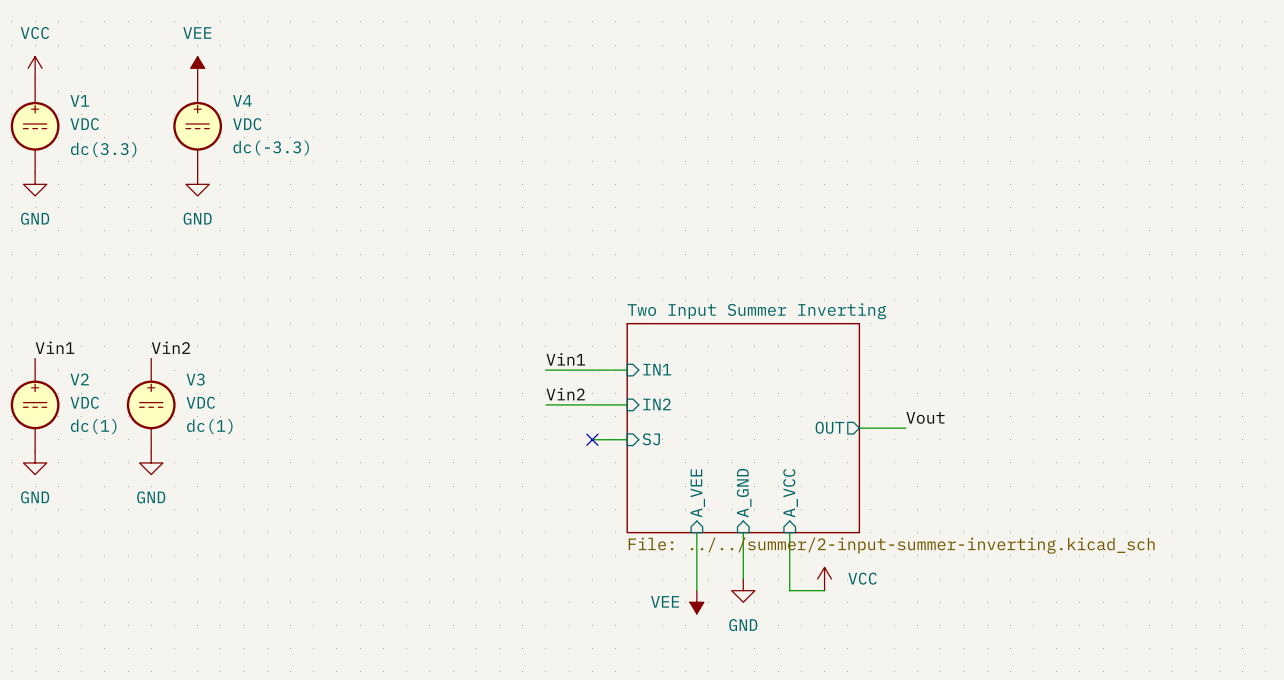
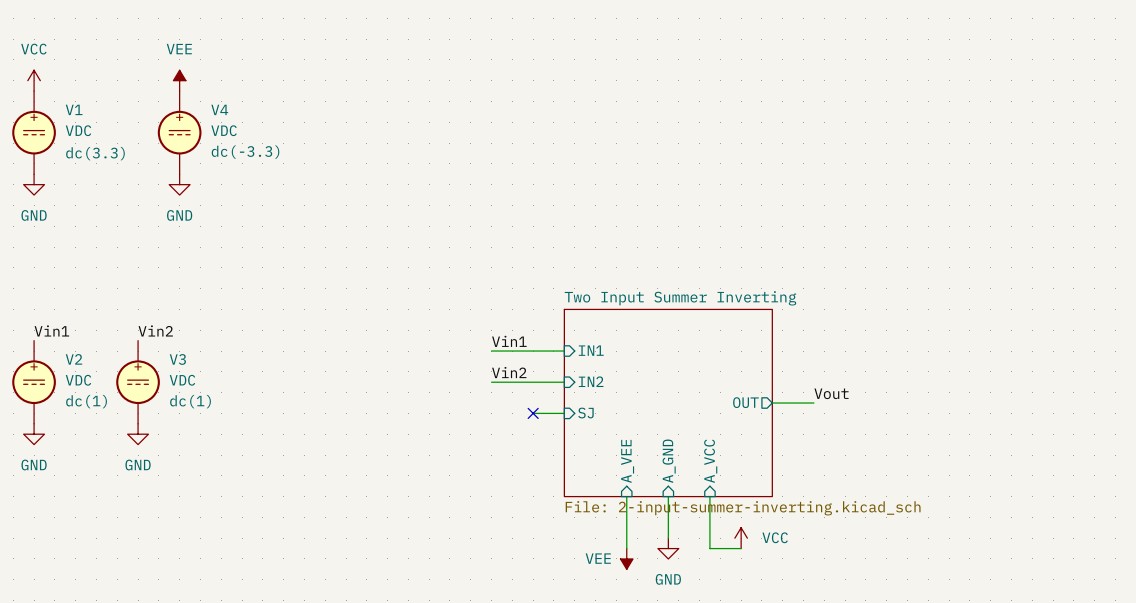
sheet Two Input Summer Inverting value: File: ../../summer/2-input-summer-inverting.kicad_sch (891, 545) -> File: 2-input-summer-inverting.kicad_sch (743, 508)

